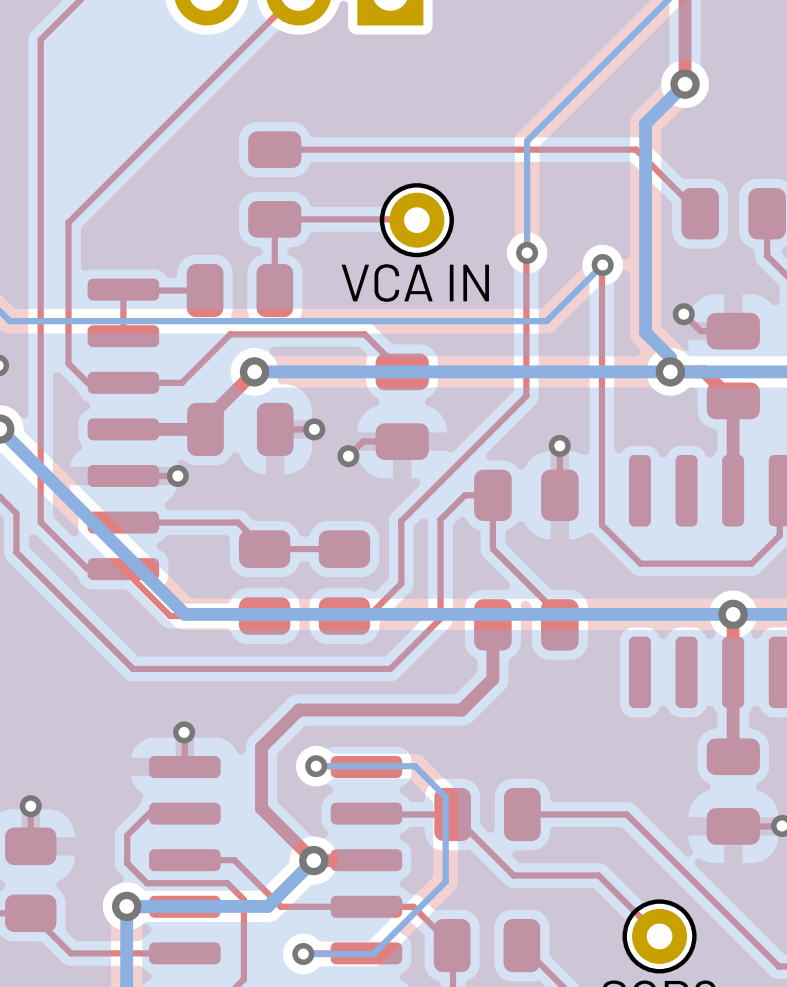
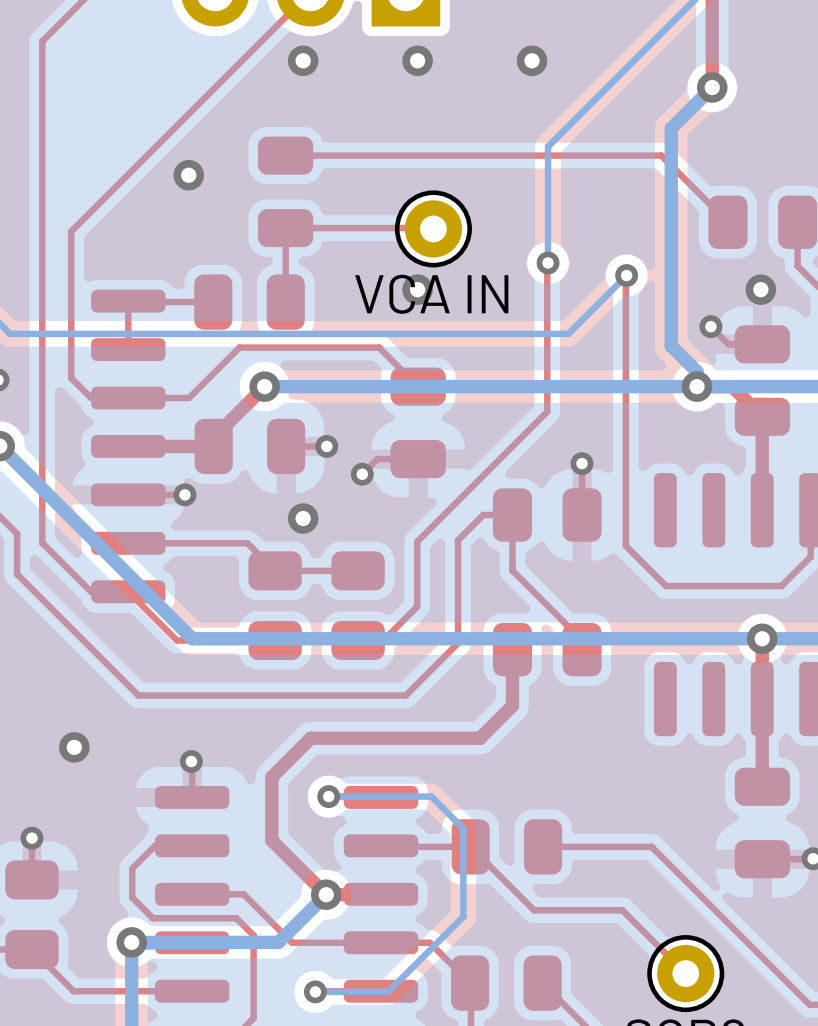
via: none -> (303, 60)
via: none -> (417, 60)
via: none -> (532, 60)
via: none -> (188, 175)
via: none -> (417, 289)
via: none -> (760, 289)
via: none -> (303, 518)
via: none -> (74, 747)

